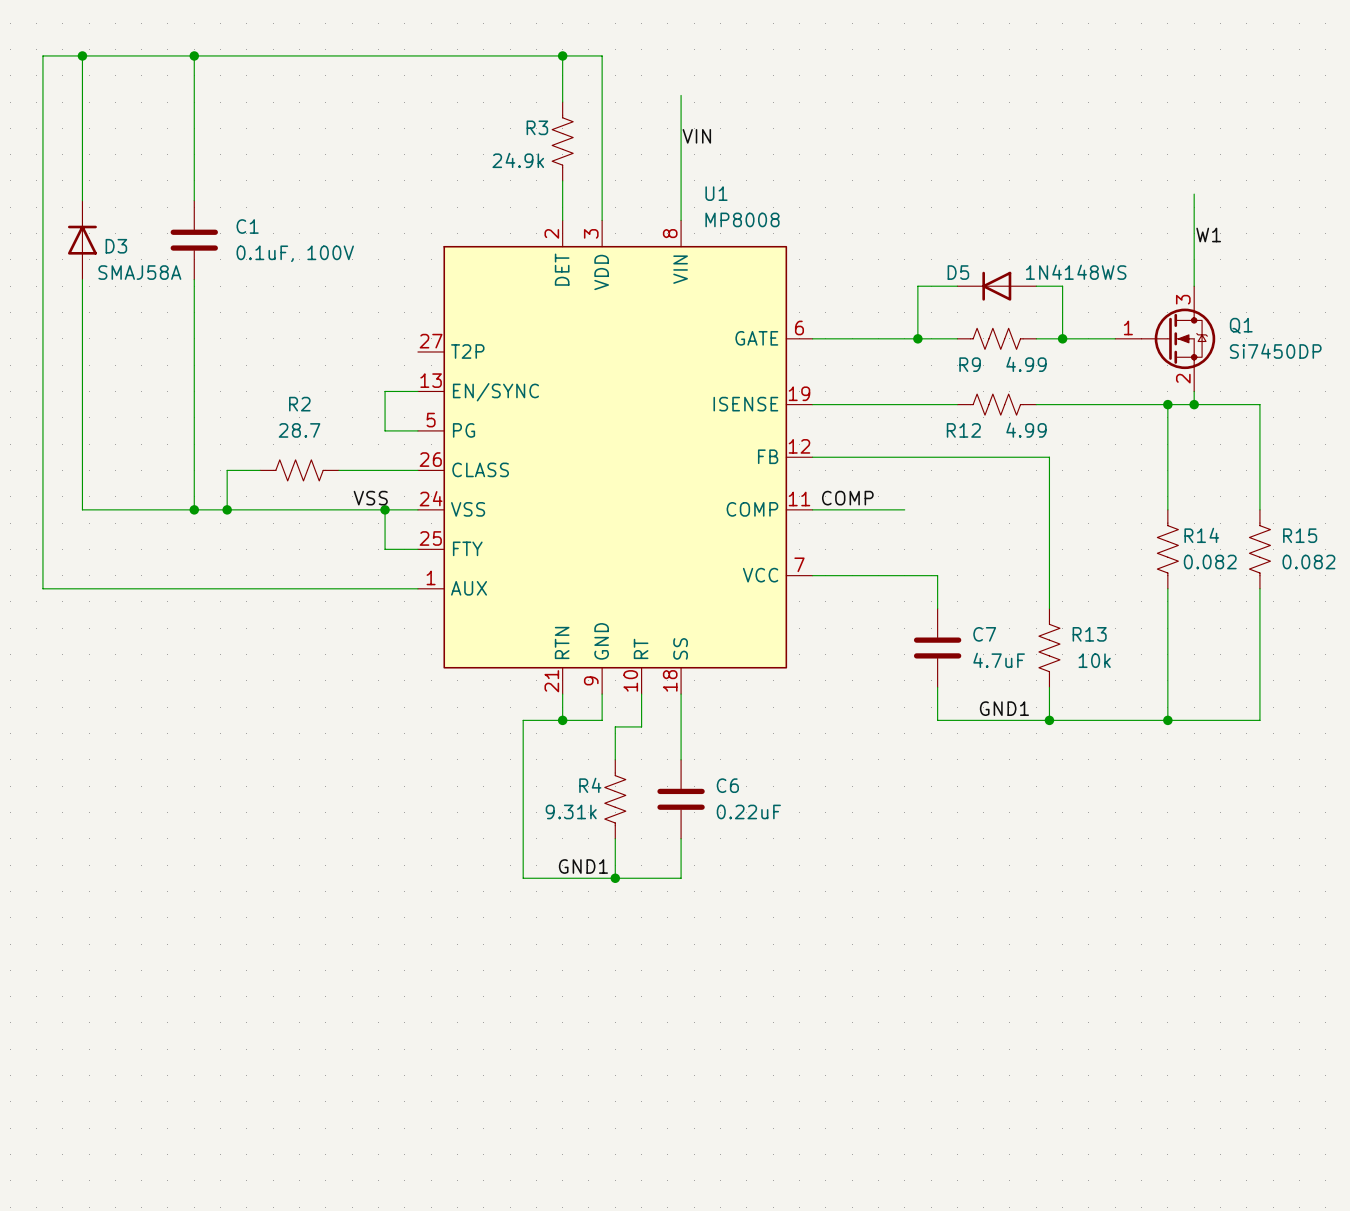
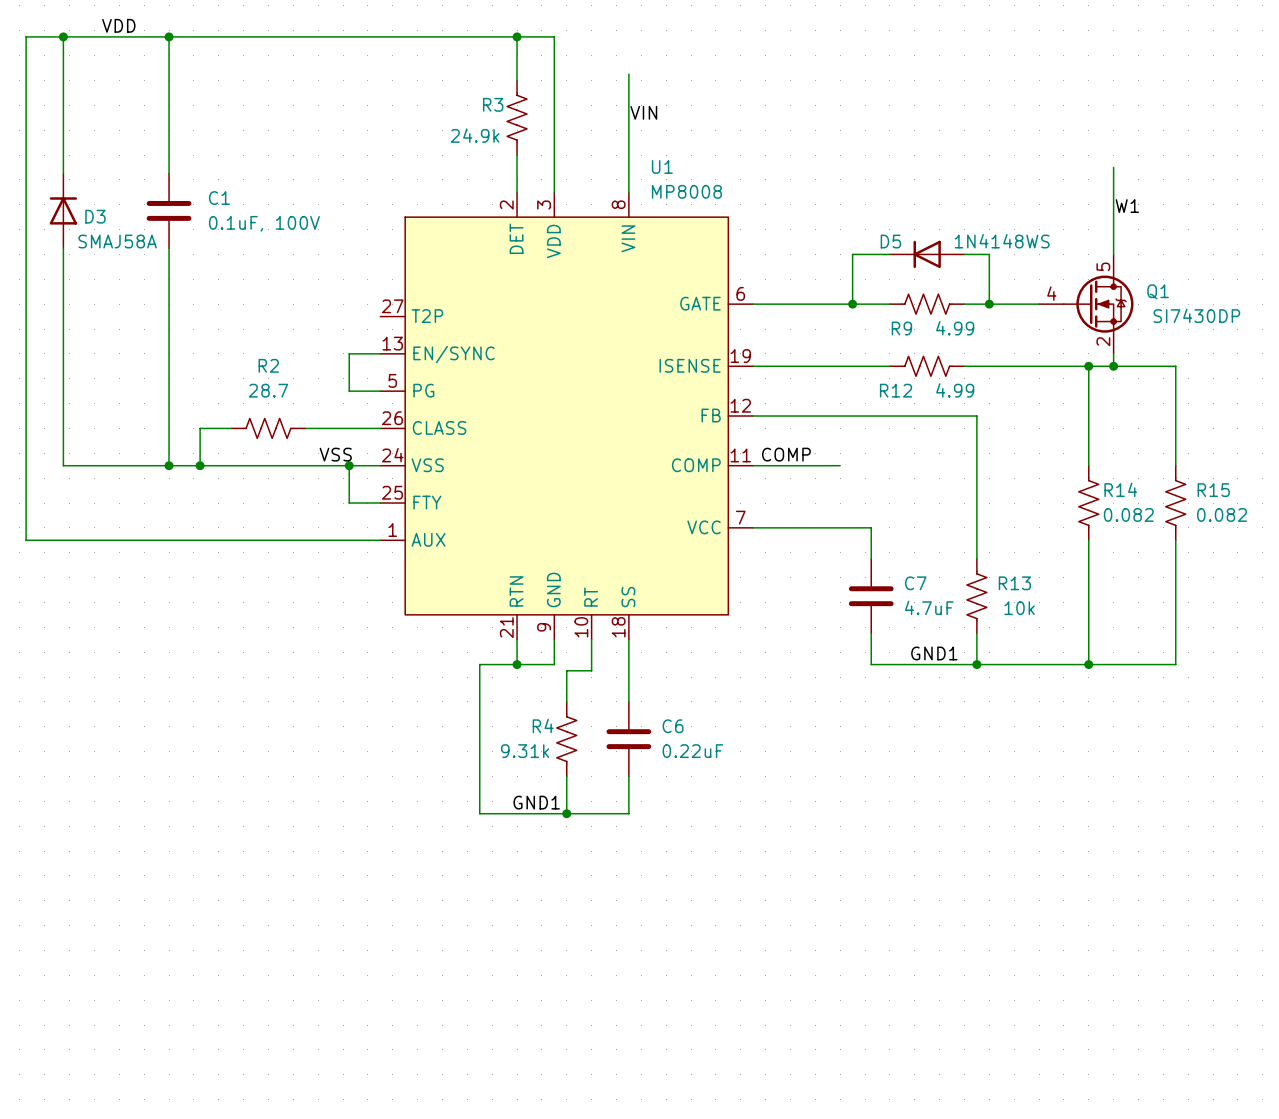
label: none -> VDD (118, 25)
Q1 pin number: 3 (1183, 299) -> 5 (1103, 266)
Q1 pin number: 1 (1128, 327) -> 4 (1051, 293)
Q1 value: Si7450DP (1275, 351) -> SI7430DP (1196, 315)

